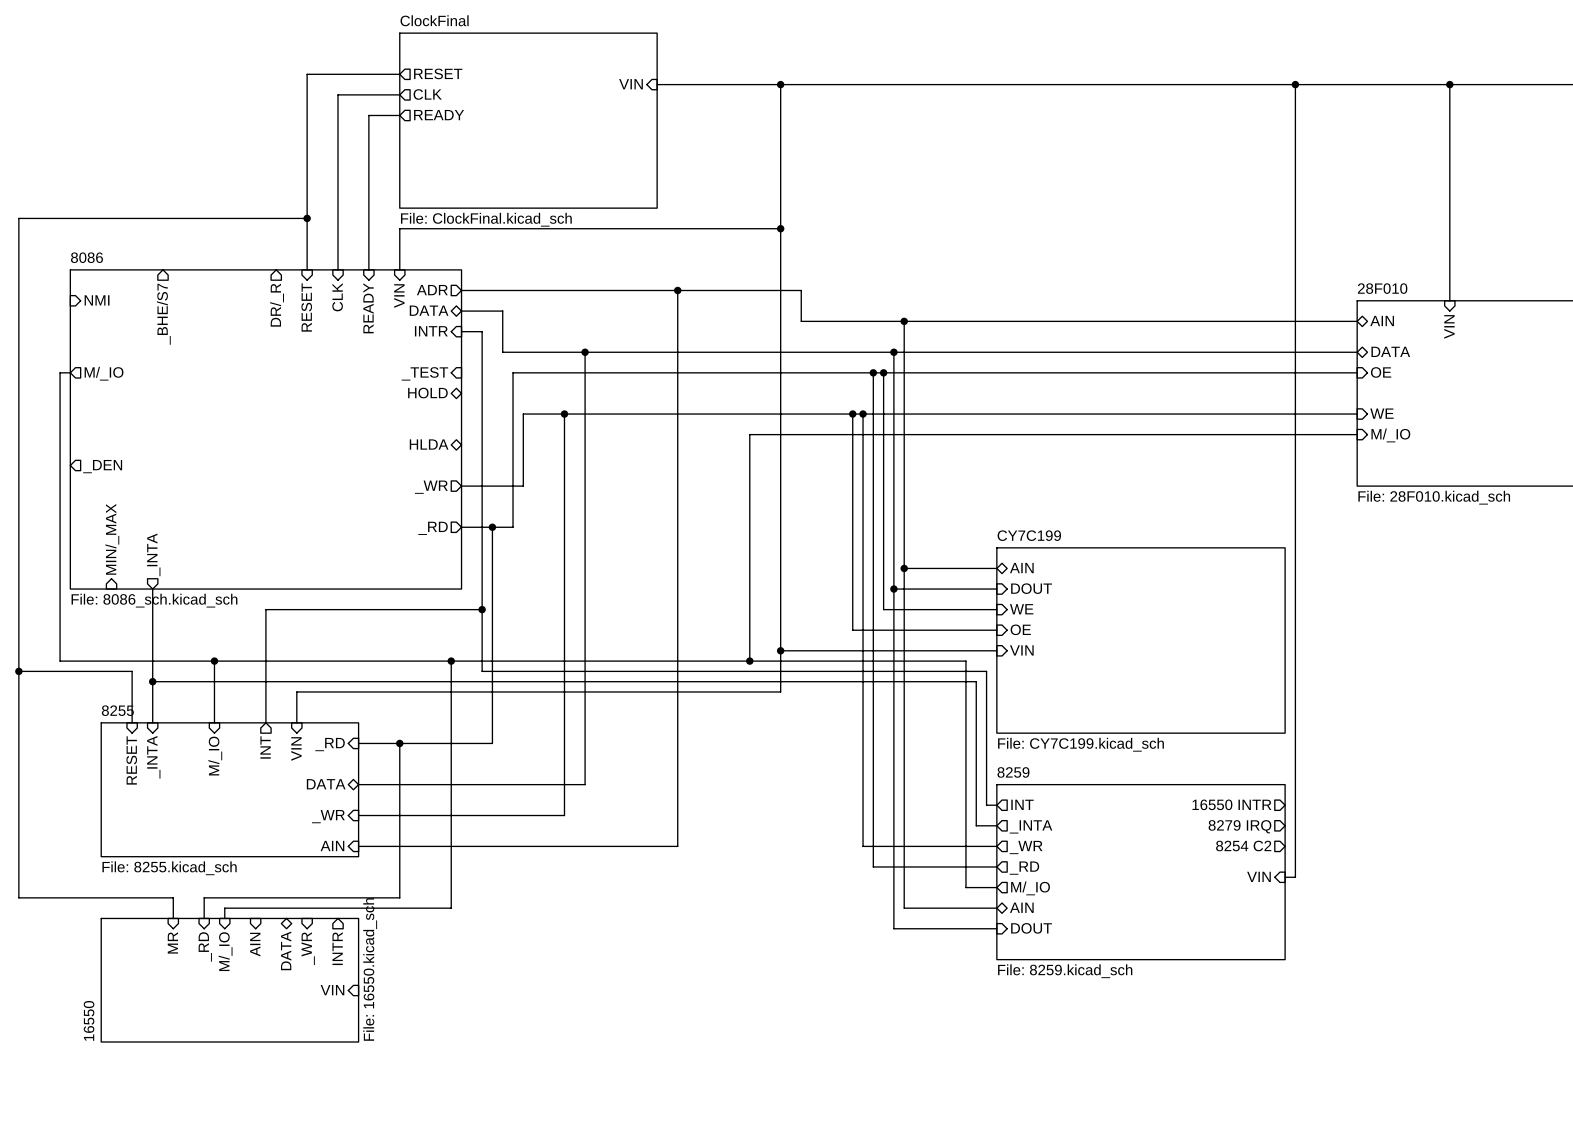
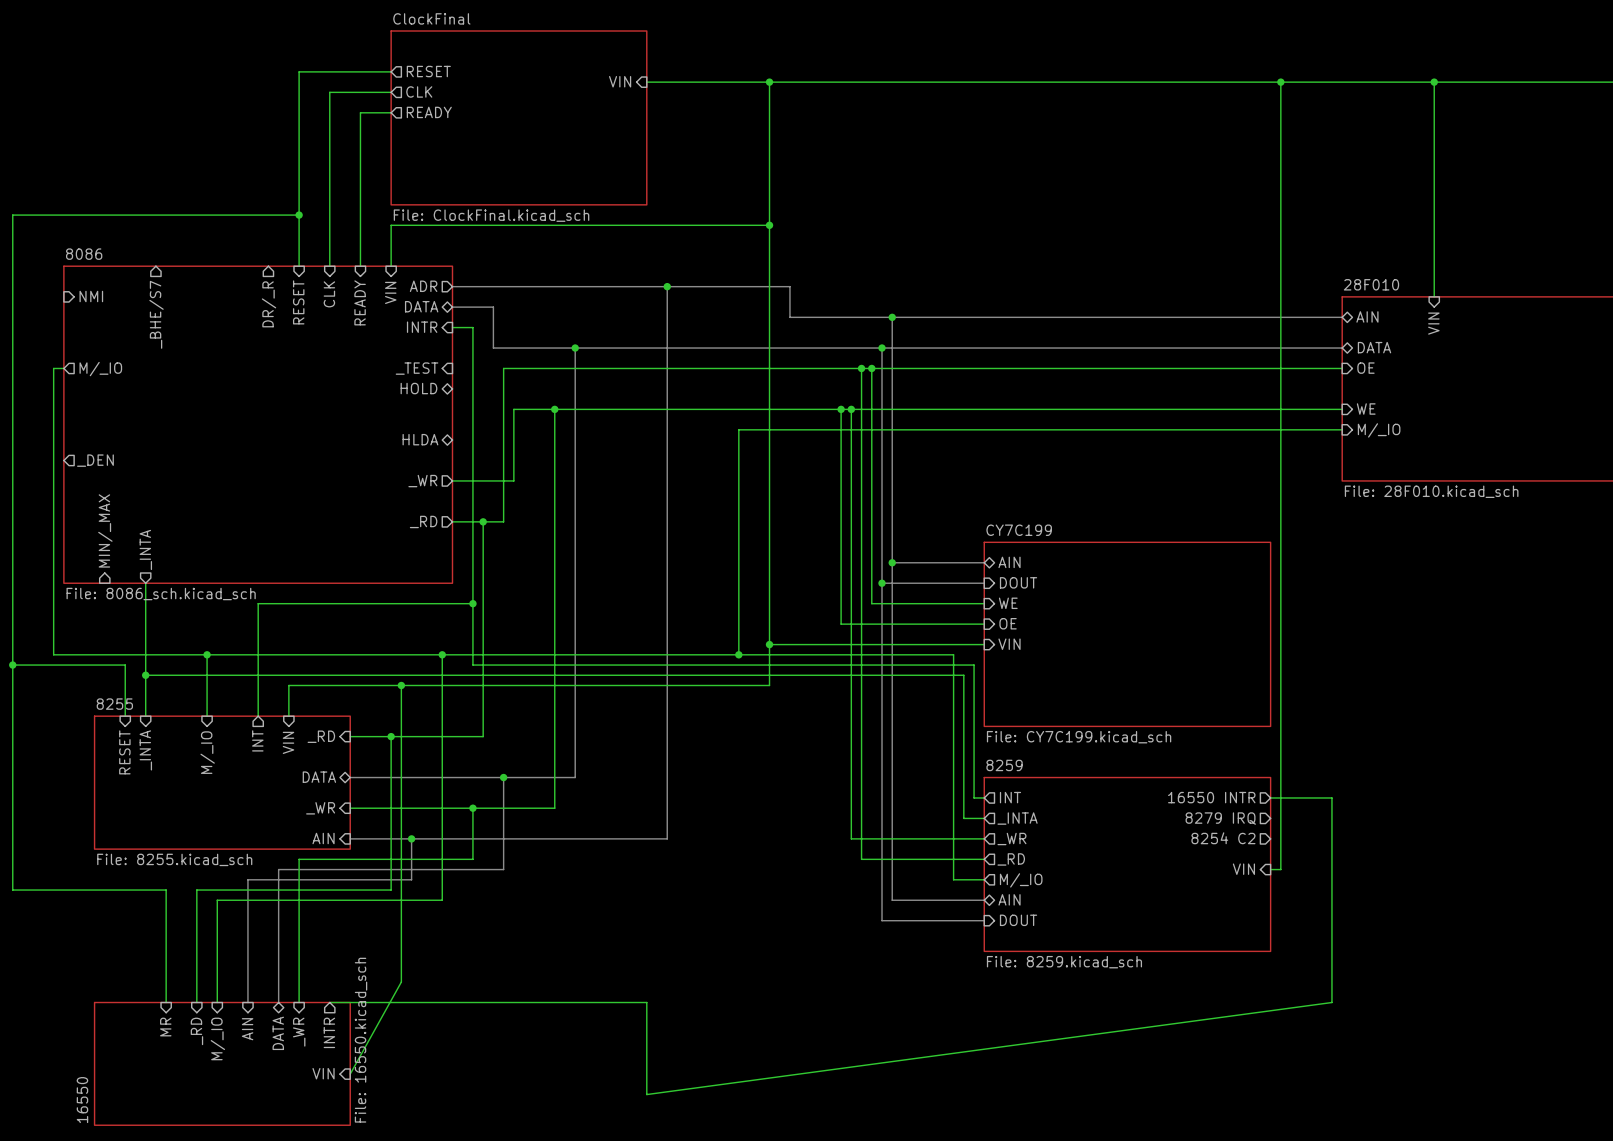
wire: none -> (401, 685) (401, 982) (350, 1074)
junction: none -> (401, 685)
bus: none -> (503, 777) (503, 869) (278, 869) (278, 1002)
junction: none -> (503, 777)
wire: none -> (1270, 797) (1331, 797) (1331, 1002) (646, 1094) (646, 1002) (329, 1002)
wire: none -> (472, 808) (472, 859) (299, 859) (299, 1002)
junction: none -> (472, 808)
bus: none -> (411, 838) (411, 879) (247, 879) (247, 1002)
junction: none -> (411, 838)
wire: none -> (166, 910) (166, 1002)
wire: none -> (196, 910) (196, 1002)
wire: none -> (217, 910) (217, 1002)
sheet pin position: MR (172, 942) -> MR (165, 1027)
sheet pin position: AIN (255, 944) -> AIN (247, 1029)
sheet pin position: _RD (205, 946) -> _RD (196, 1031)
sheet pin position: _WR (308, 948) -> _WR (299, 1032)
sheet pin position: INTR (337, 948) -> INTR (329, 1032)
sheet pin position: DATA (286, 950) -> DATA (278, 1033)
sheet pin position: M/_IO (225, 951) -> M/_IO (217, 1038)
sheet 16550 position: (229, 980) -> (222, 1063)
sheet pin position: VIN (332, 990) -> VIN (323, 1073)

